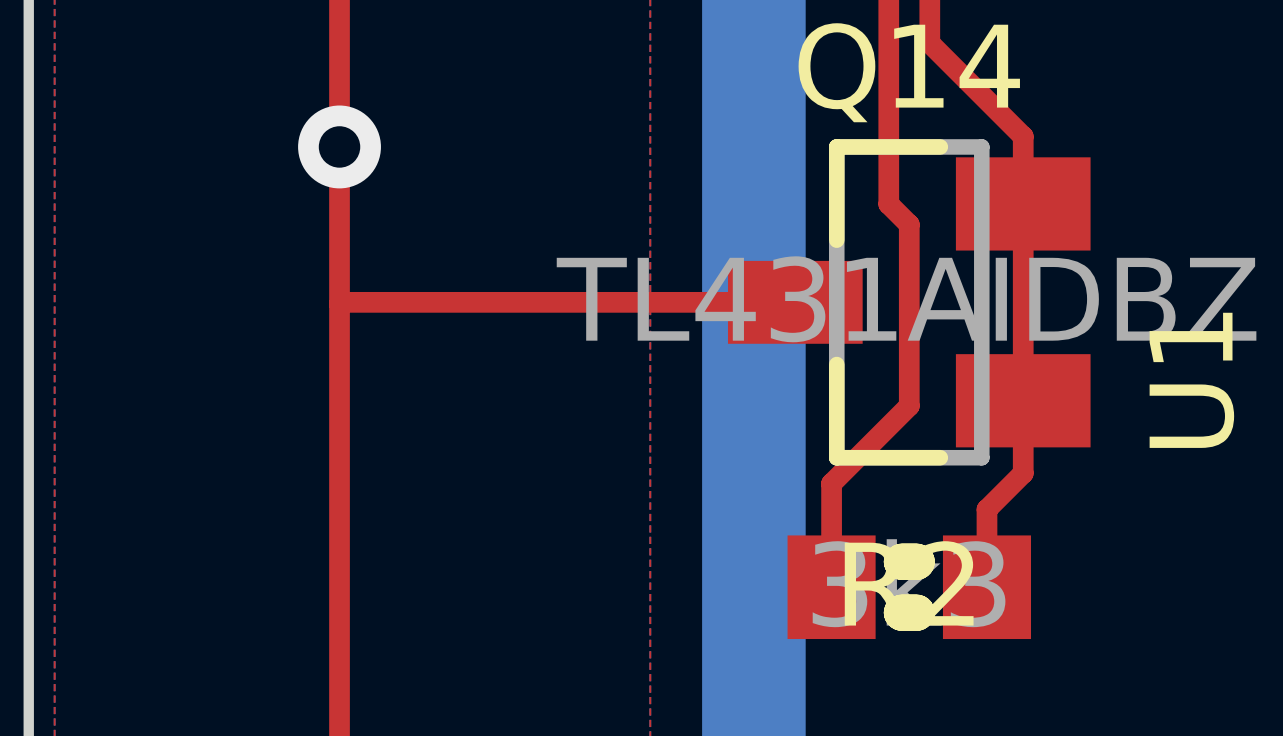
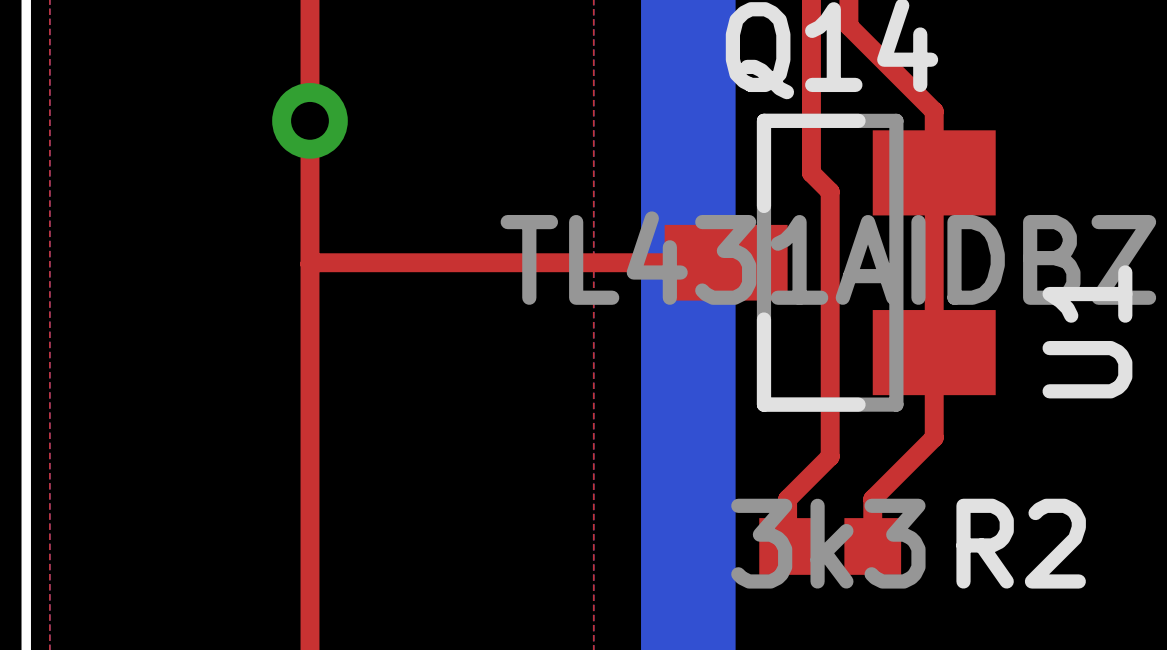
top track: (909, 405) (831, 483) (831, 587) -> (830, 357) (830, 456) (787, 499) (787, 546)
top track: (1023, 473) (986, 509) (986, 587) -> (934, 418) (934, 437) (872, 499) (872, 546)
R2 footprint: [787, 535, 1032, 640] -> [759, 518, 902, 575]

